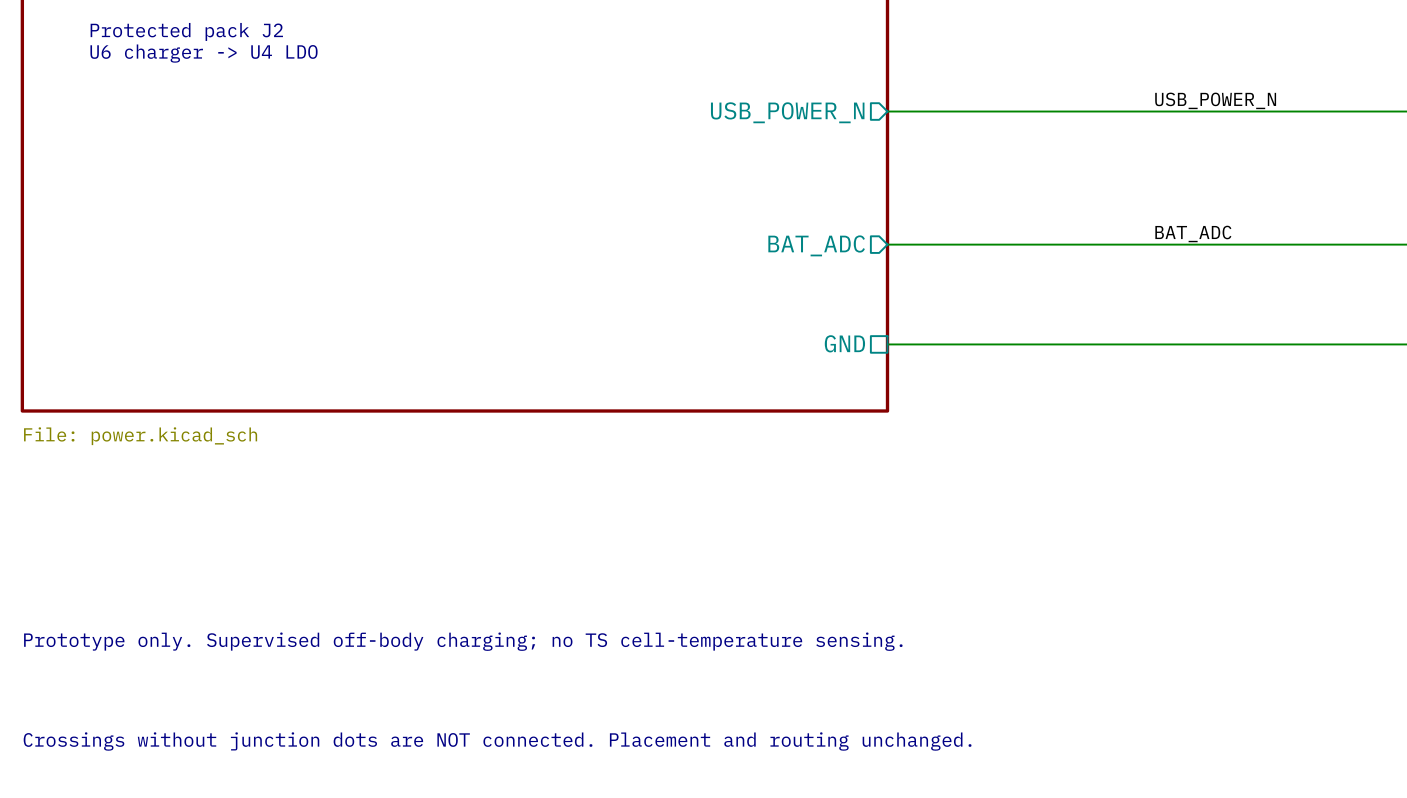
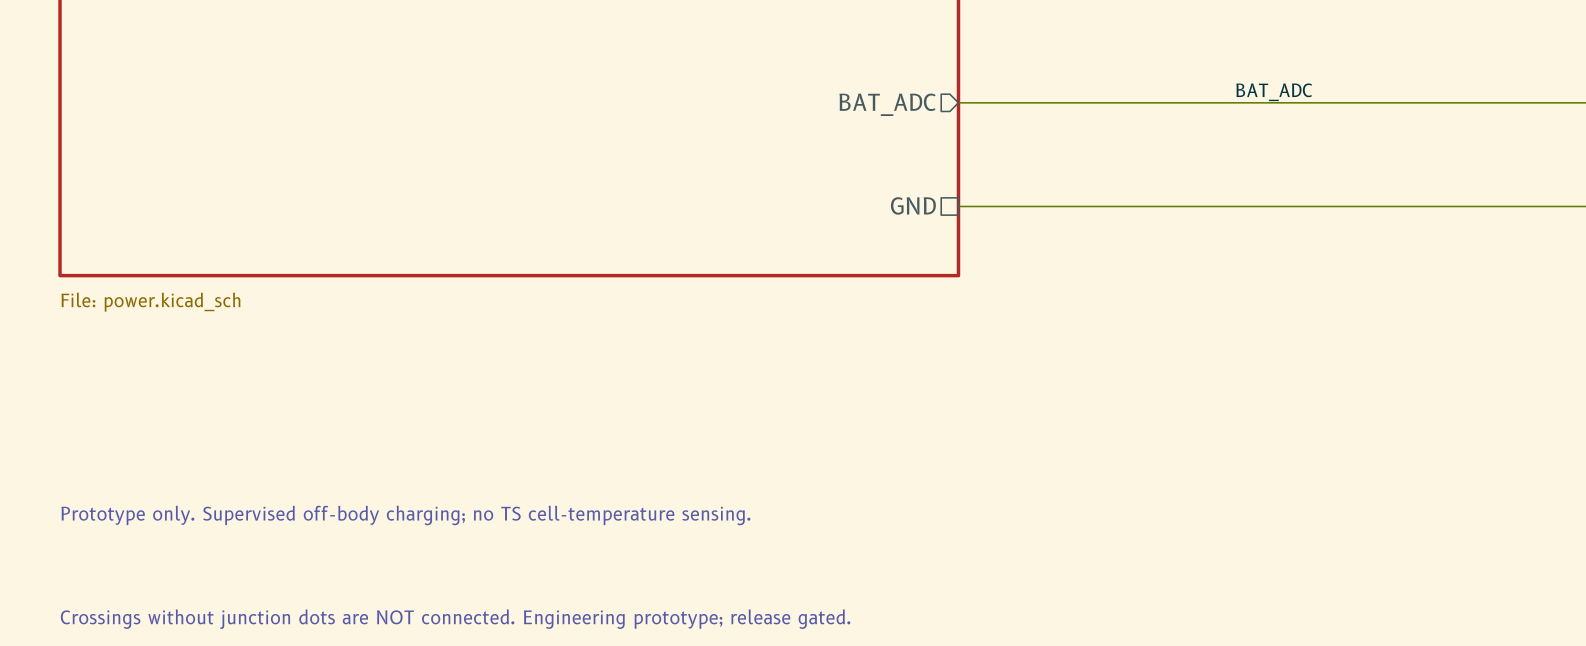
text: Crossings without junction dots are NOT connected. Placement and routing unchanged. (497, 741) -> Crossings without junction dots are NOT connected. Engineering prototype; release gated. (455, 619)

